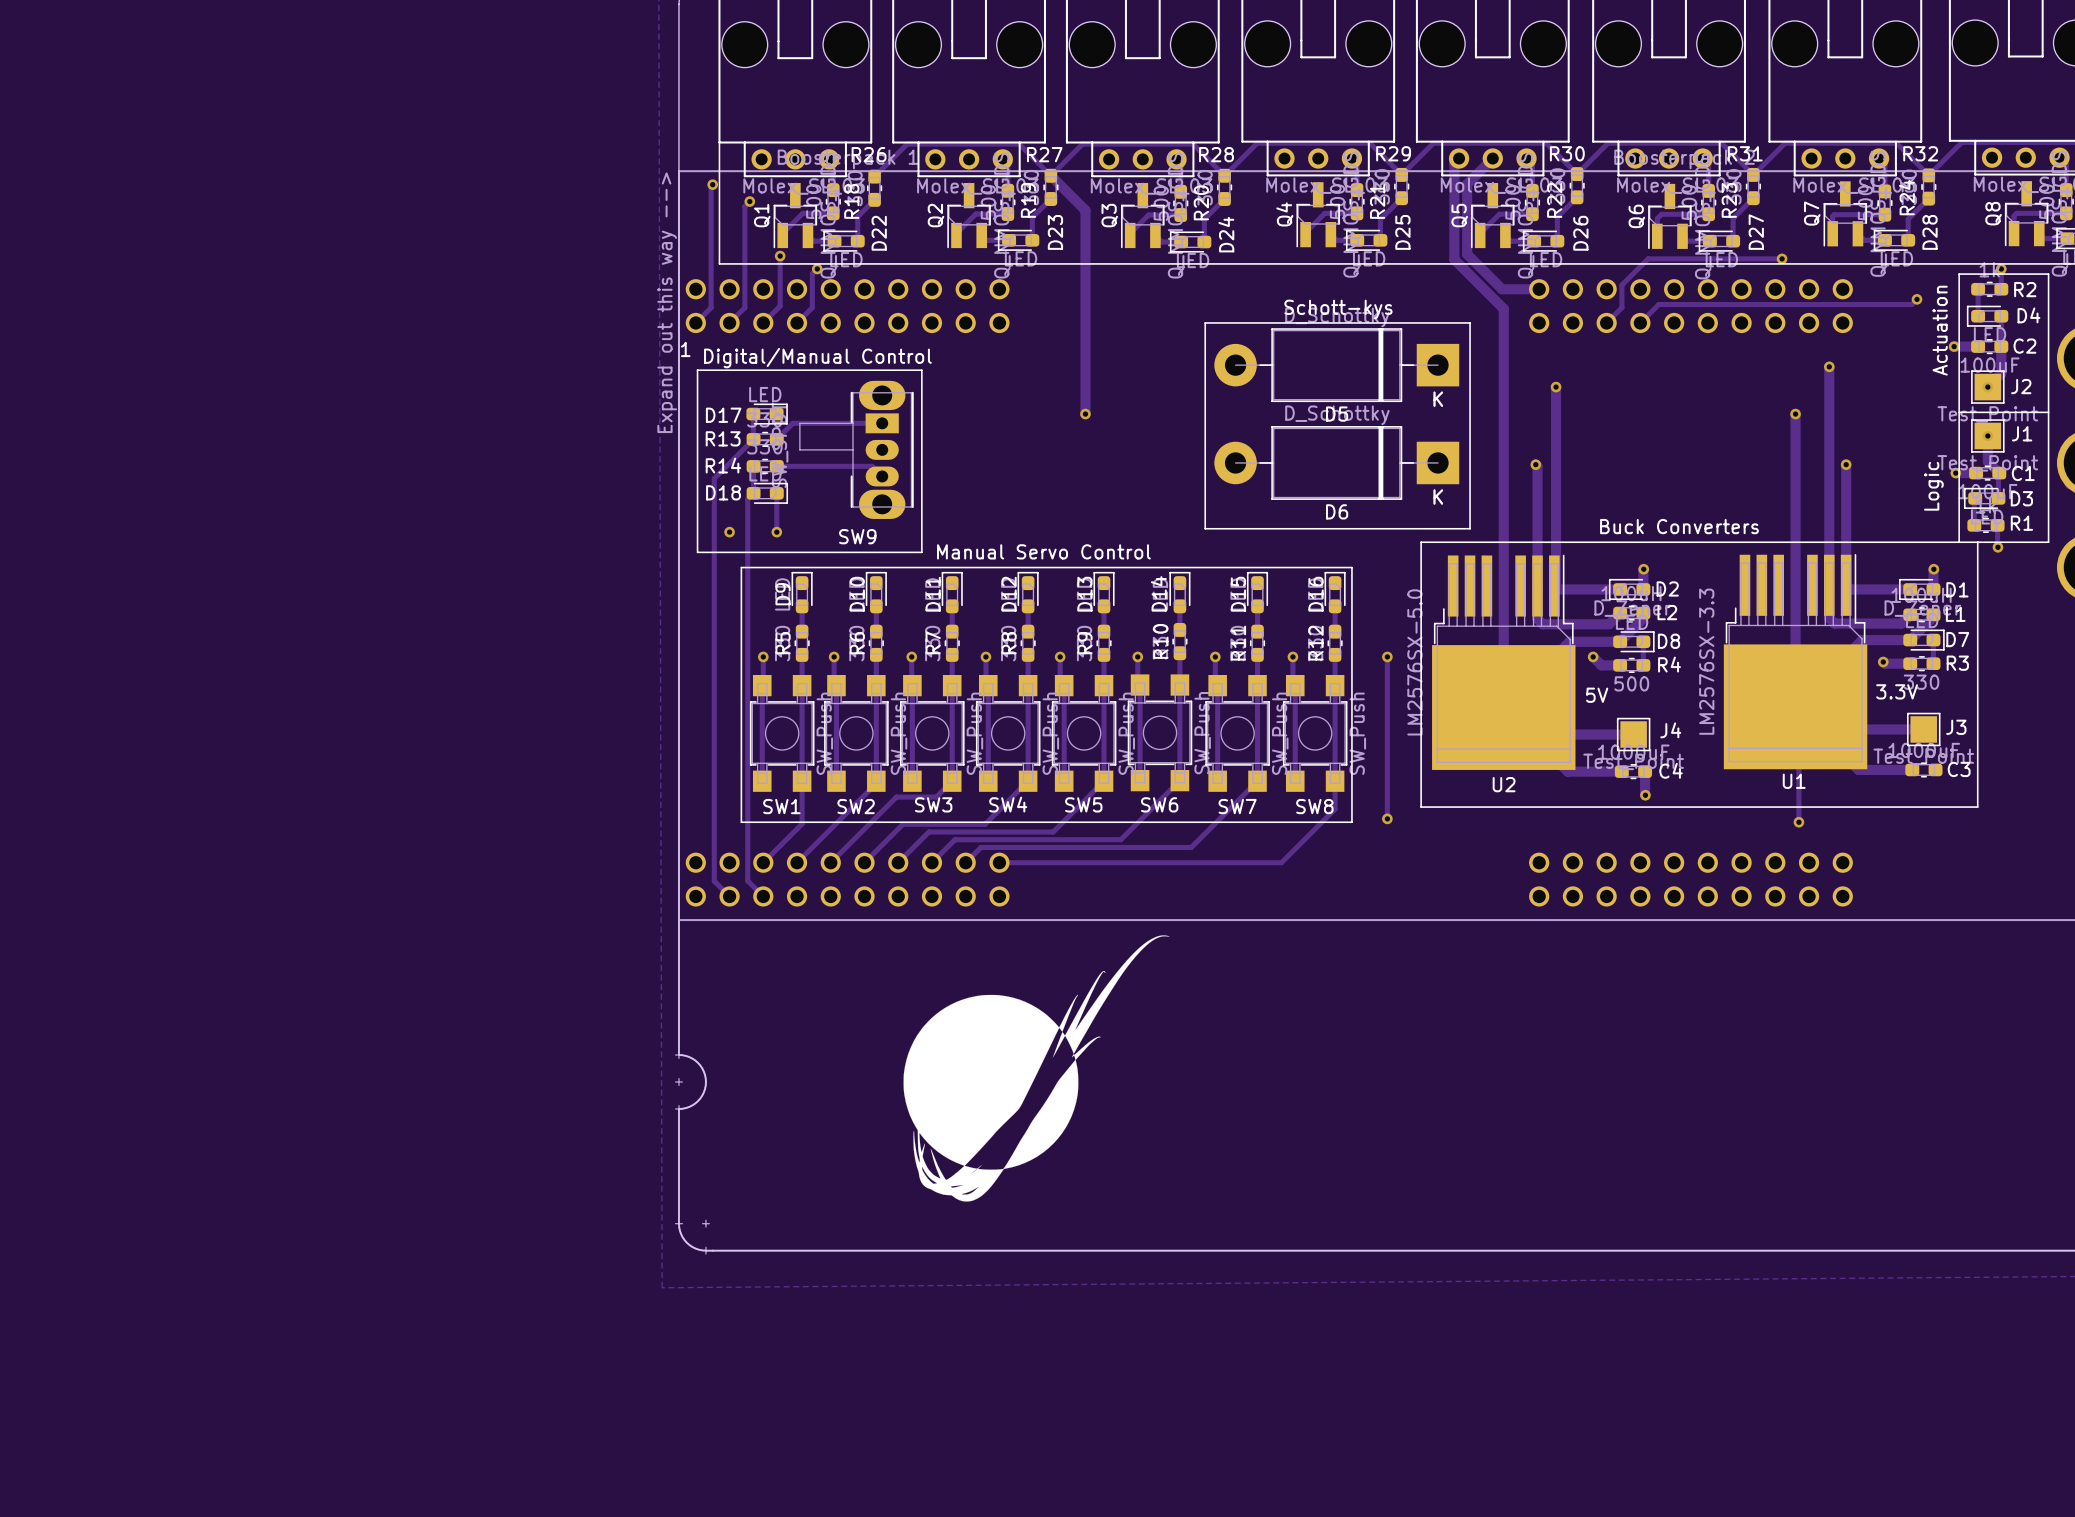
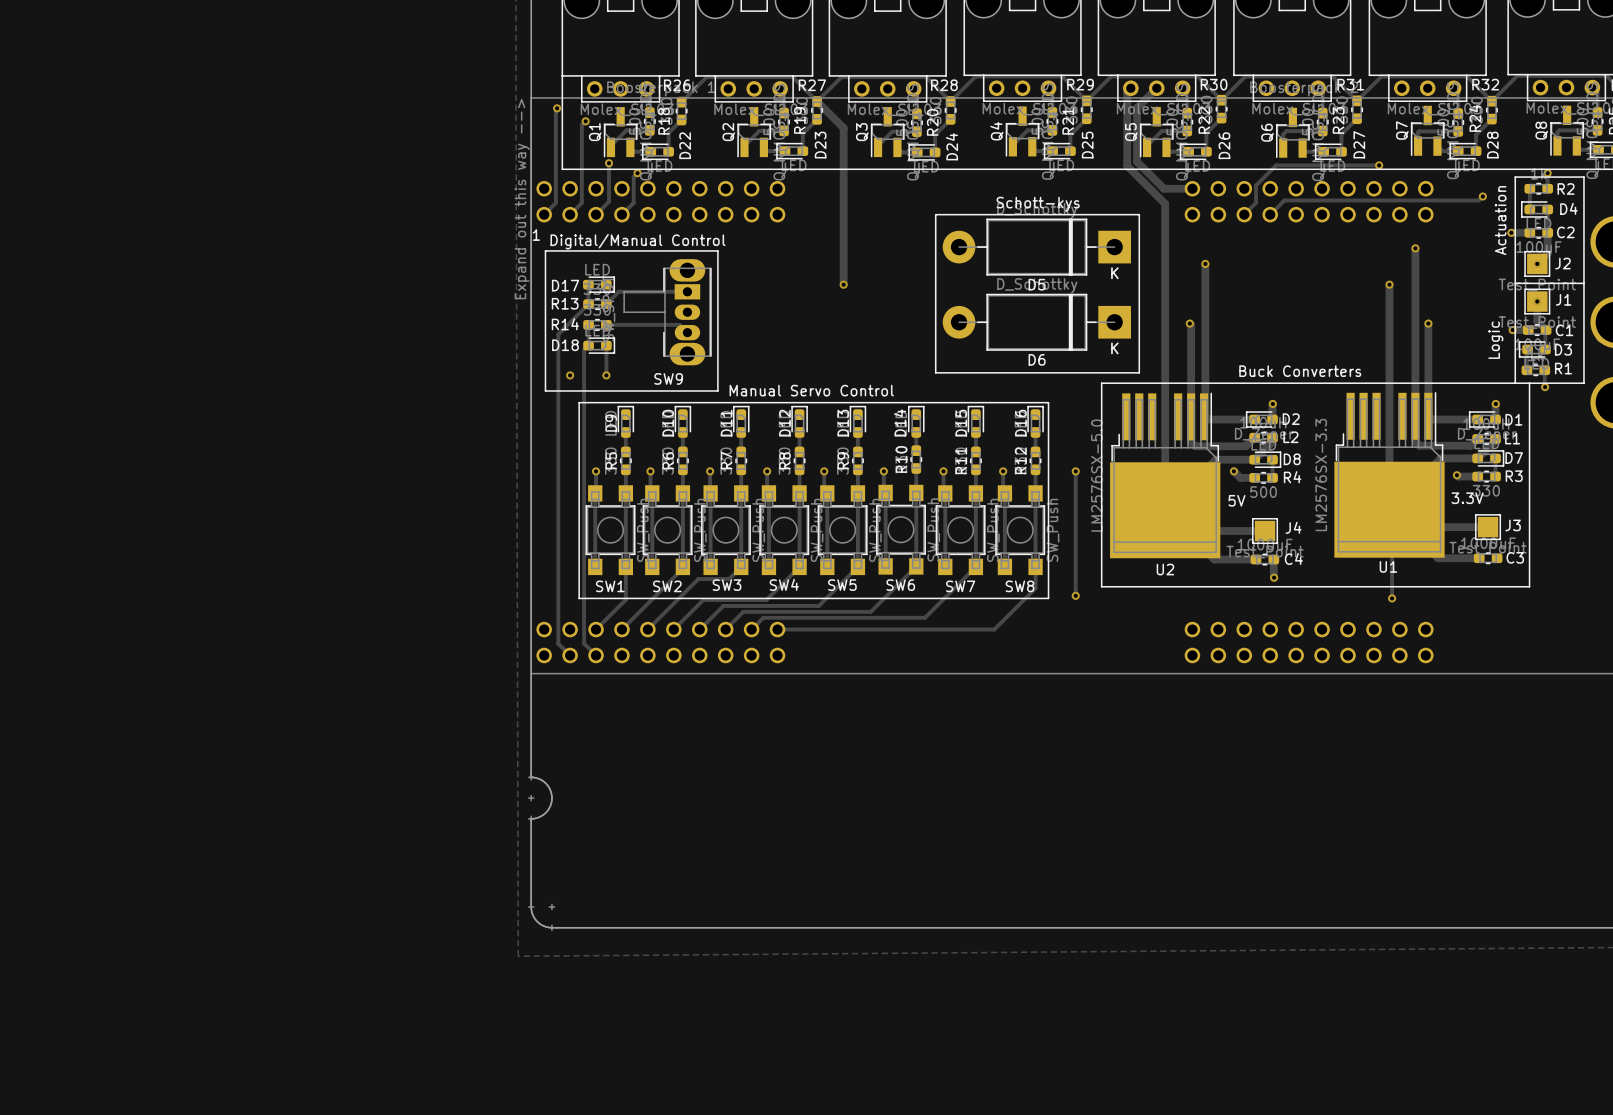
drawing: [903, 935, 1170, 1202] -> none

